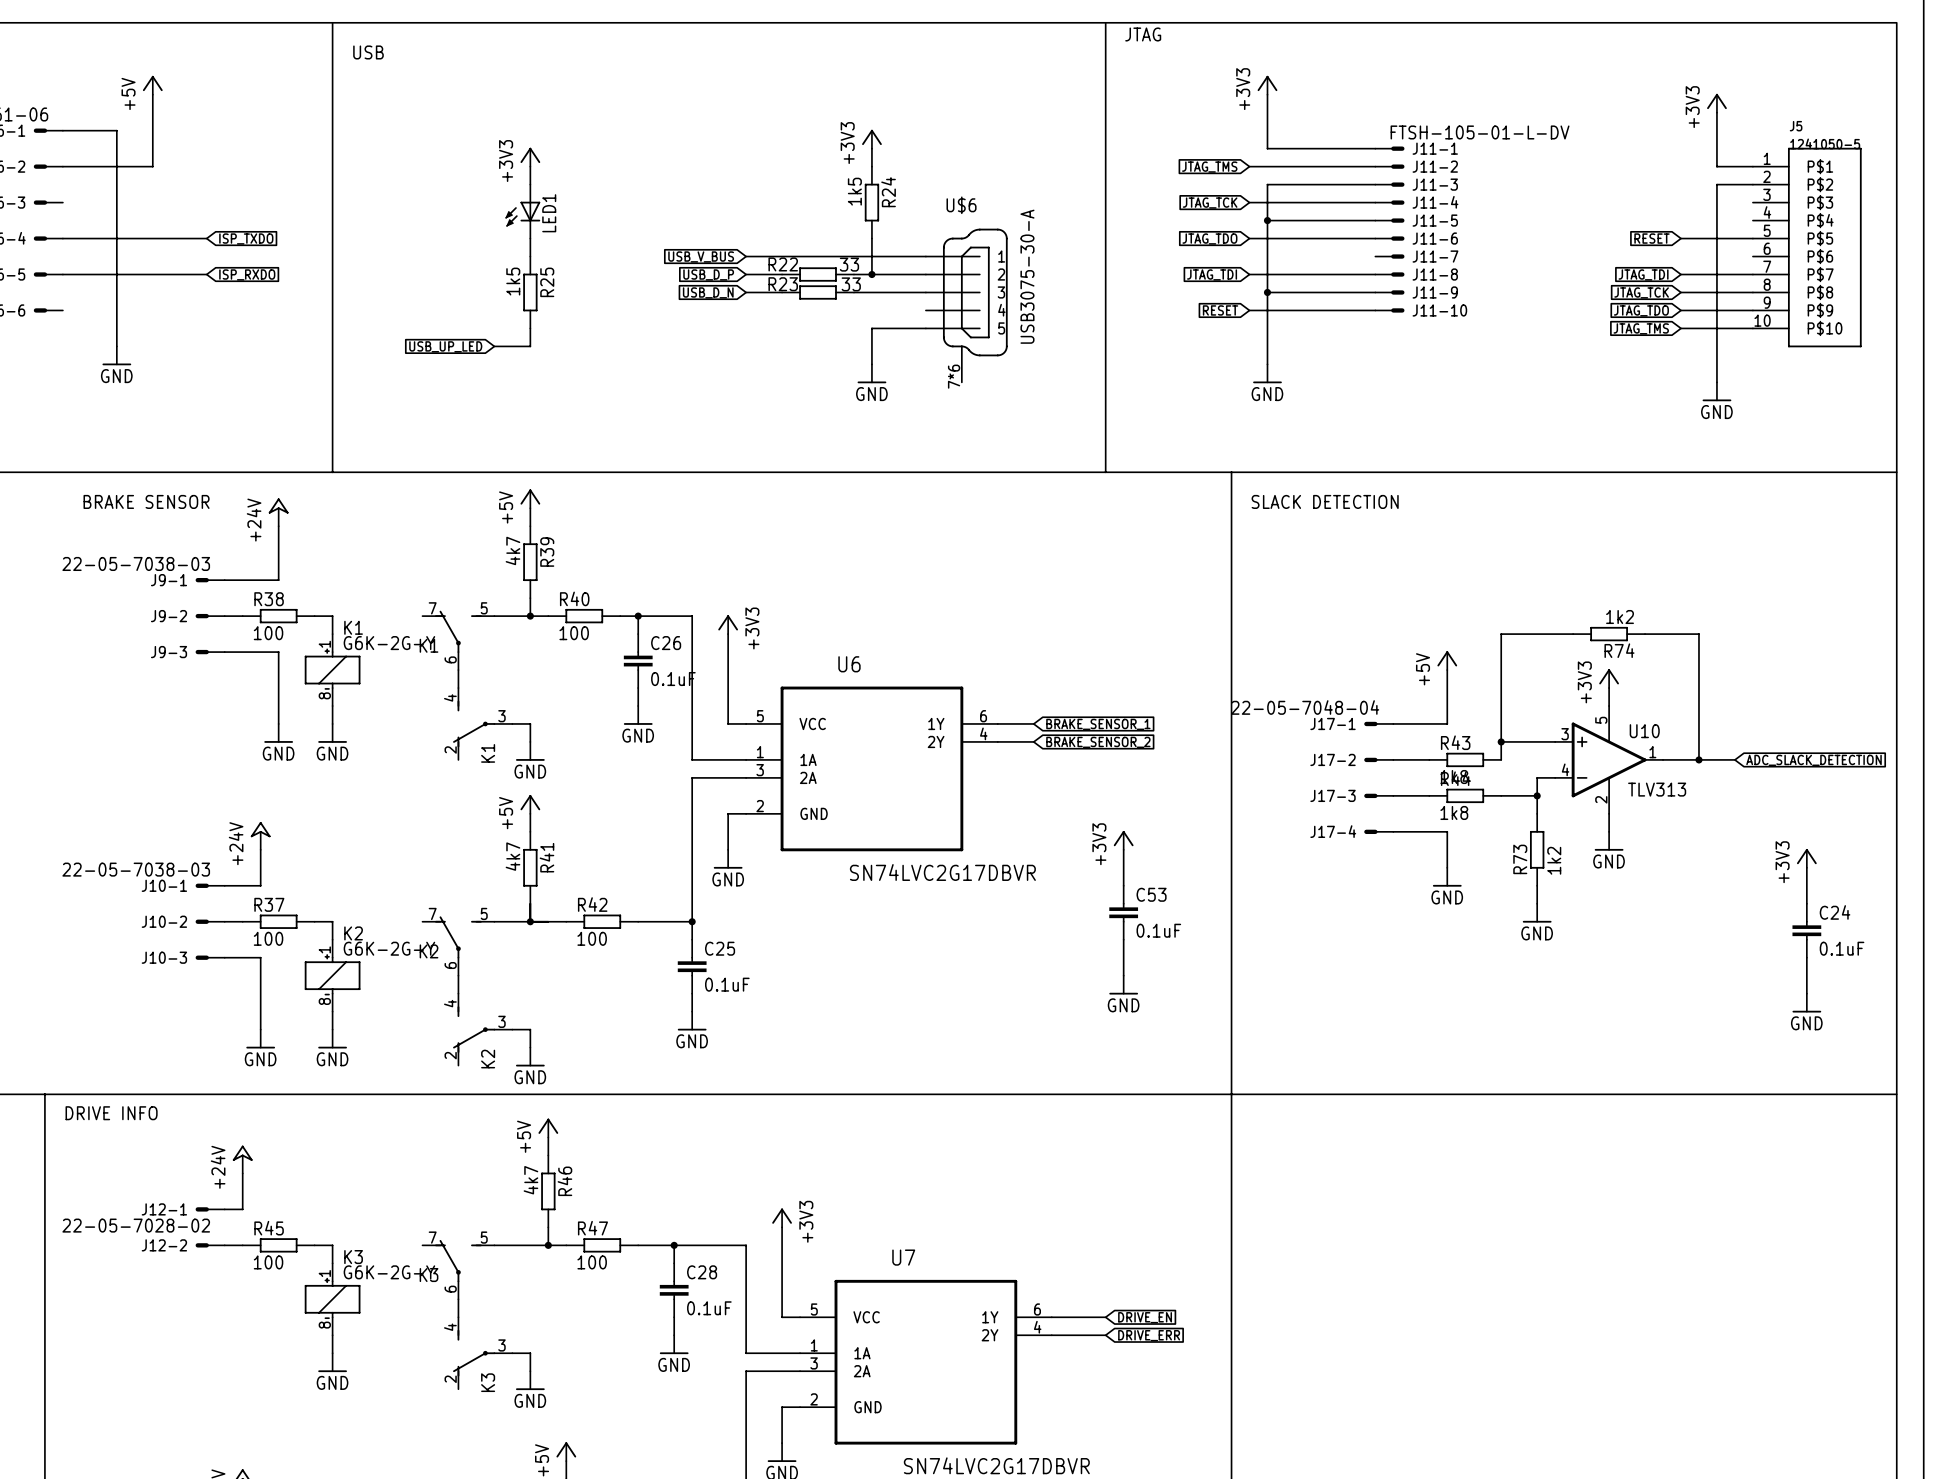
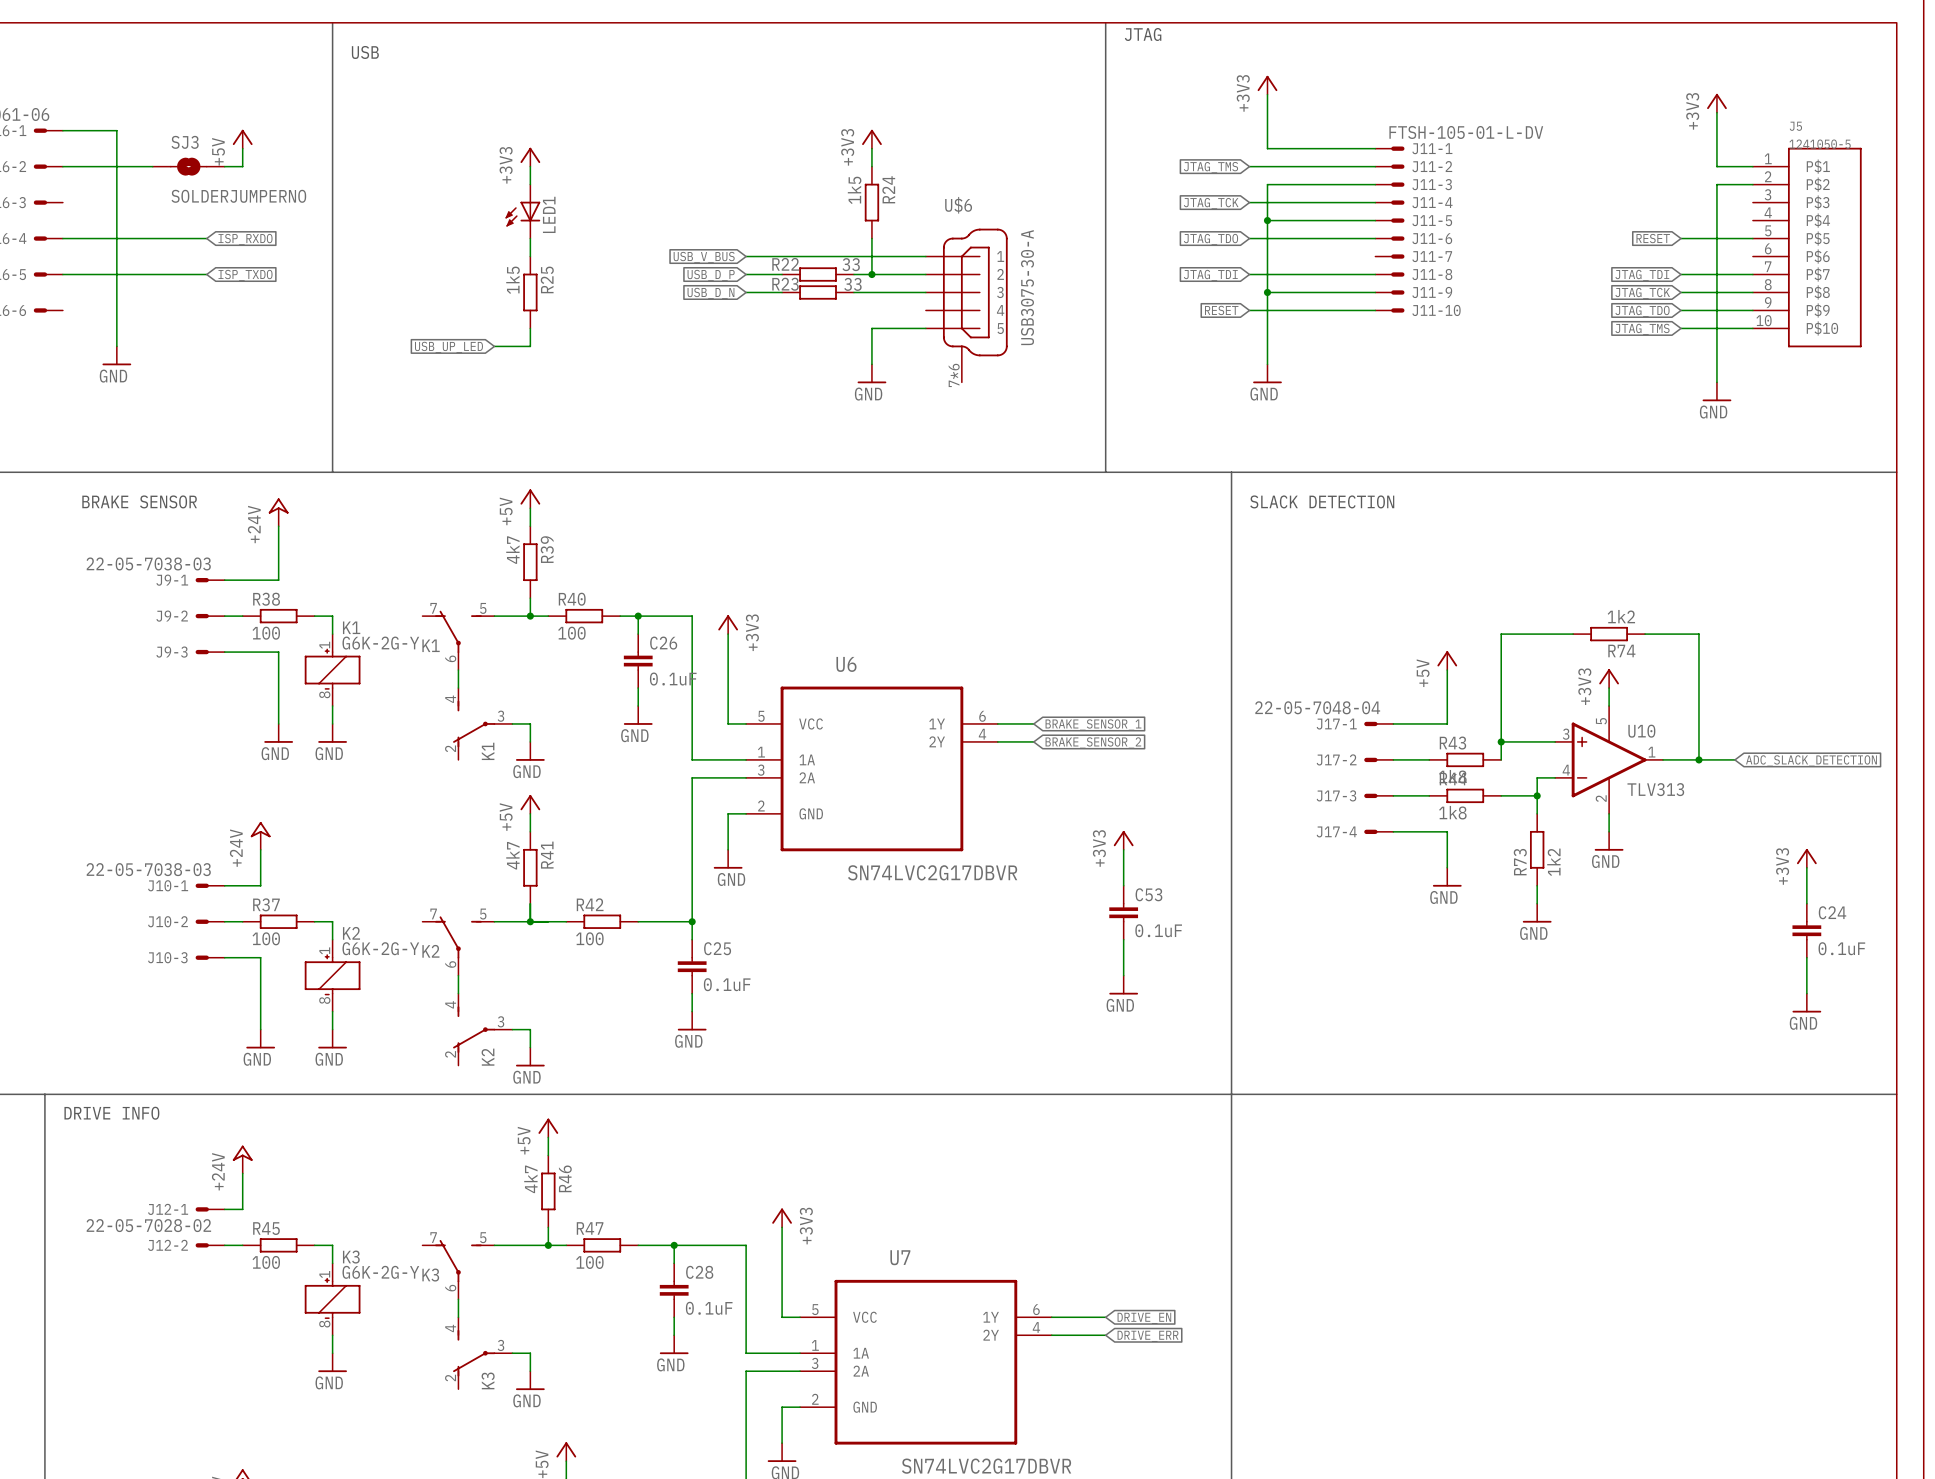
power symbol position: +5V (152, 85) -> +5V (242, 139)
wire: (152, 94) (152, 166) -> none
wire: none -> (242, 148) (242, 166) (224, 166)
SJ3: none -> SOLDERJUMPERNO (188, 166)
global label: ISP_TXDO (246, 238) -> ISP_RXDO (245, 239)
global label: ISP_RXDO (247, 274) -> ISP_TXDO (245, 275)

